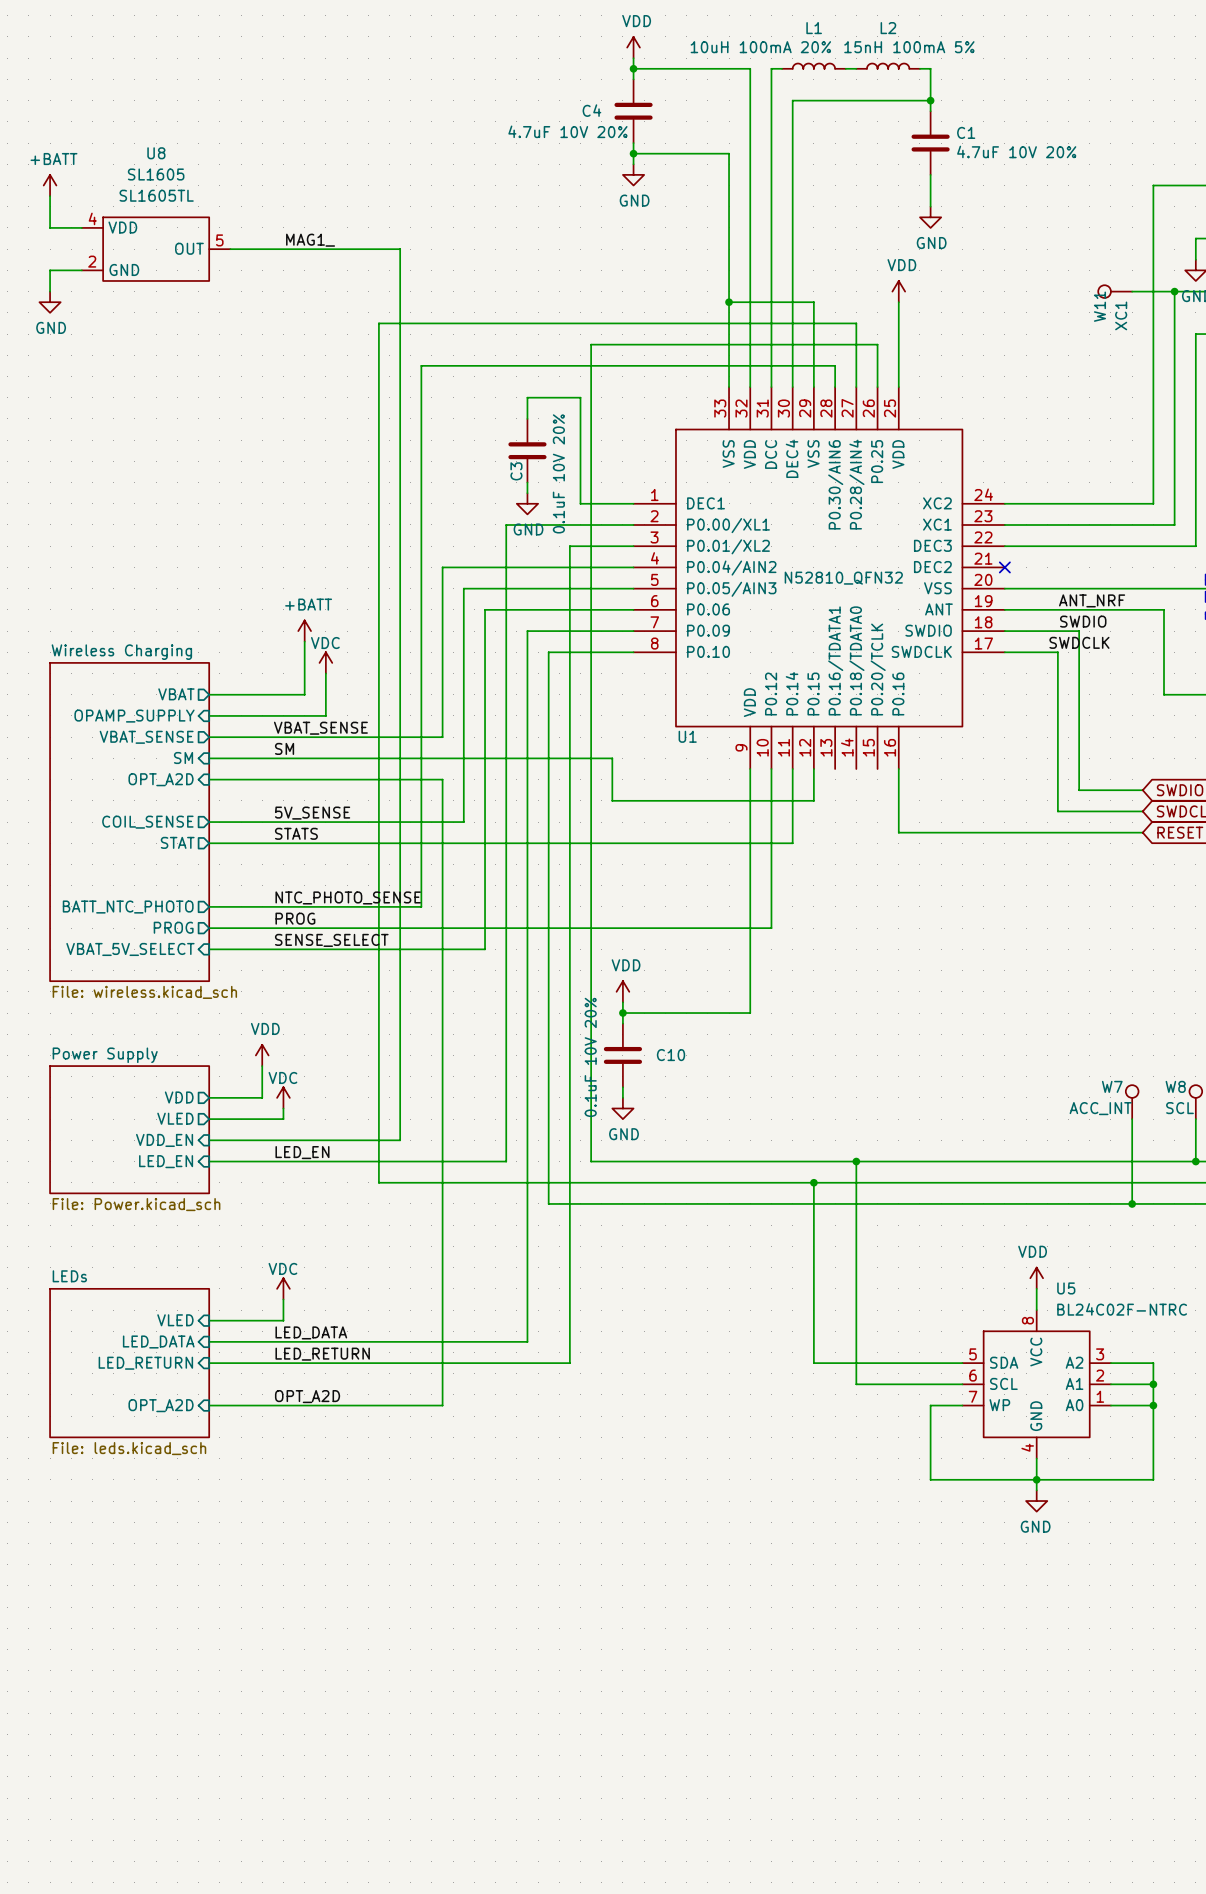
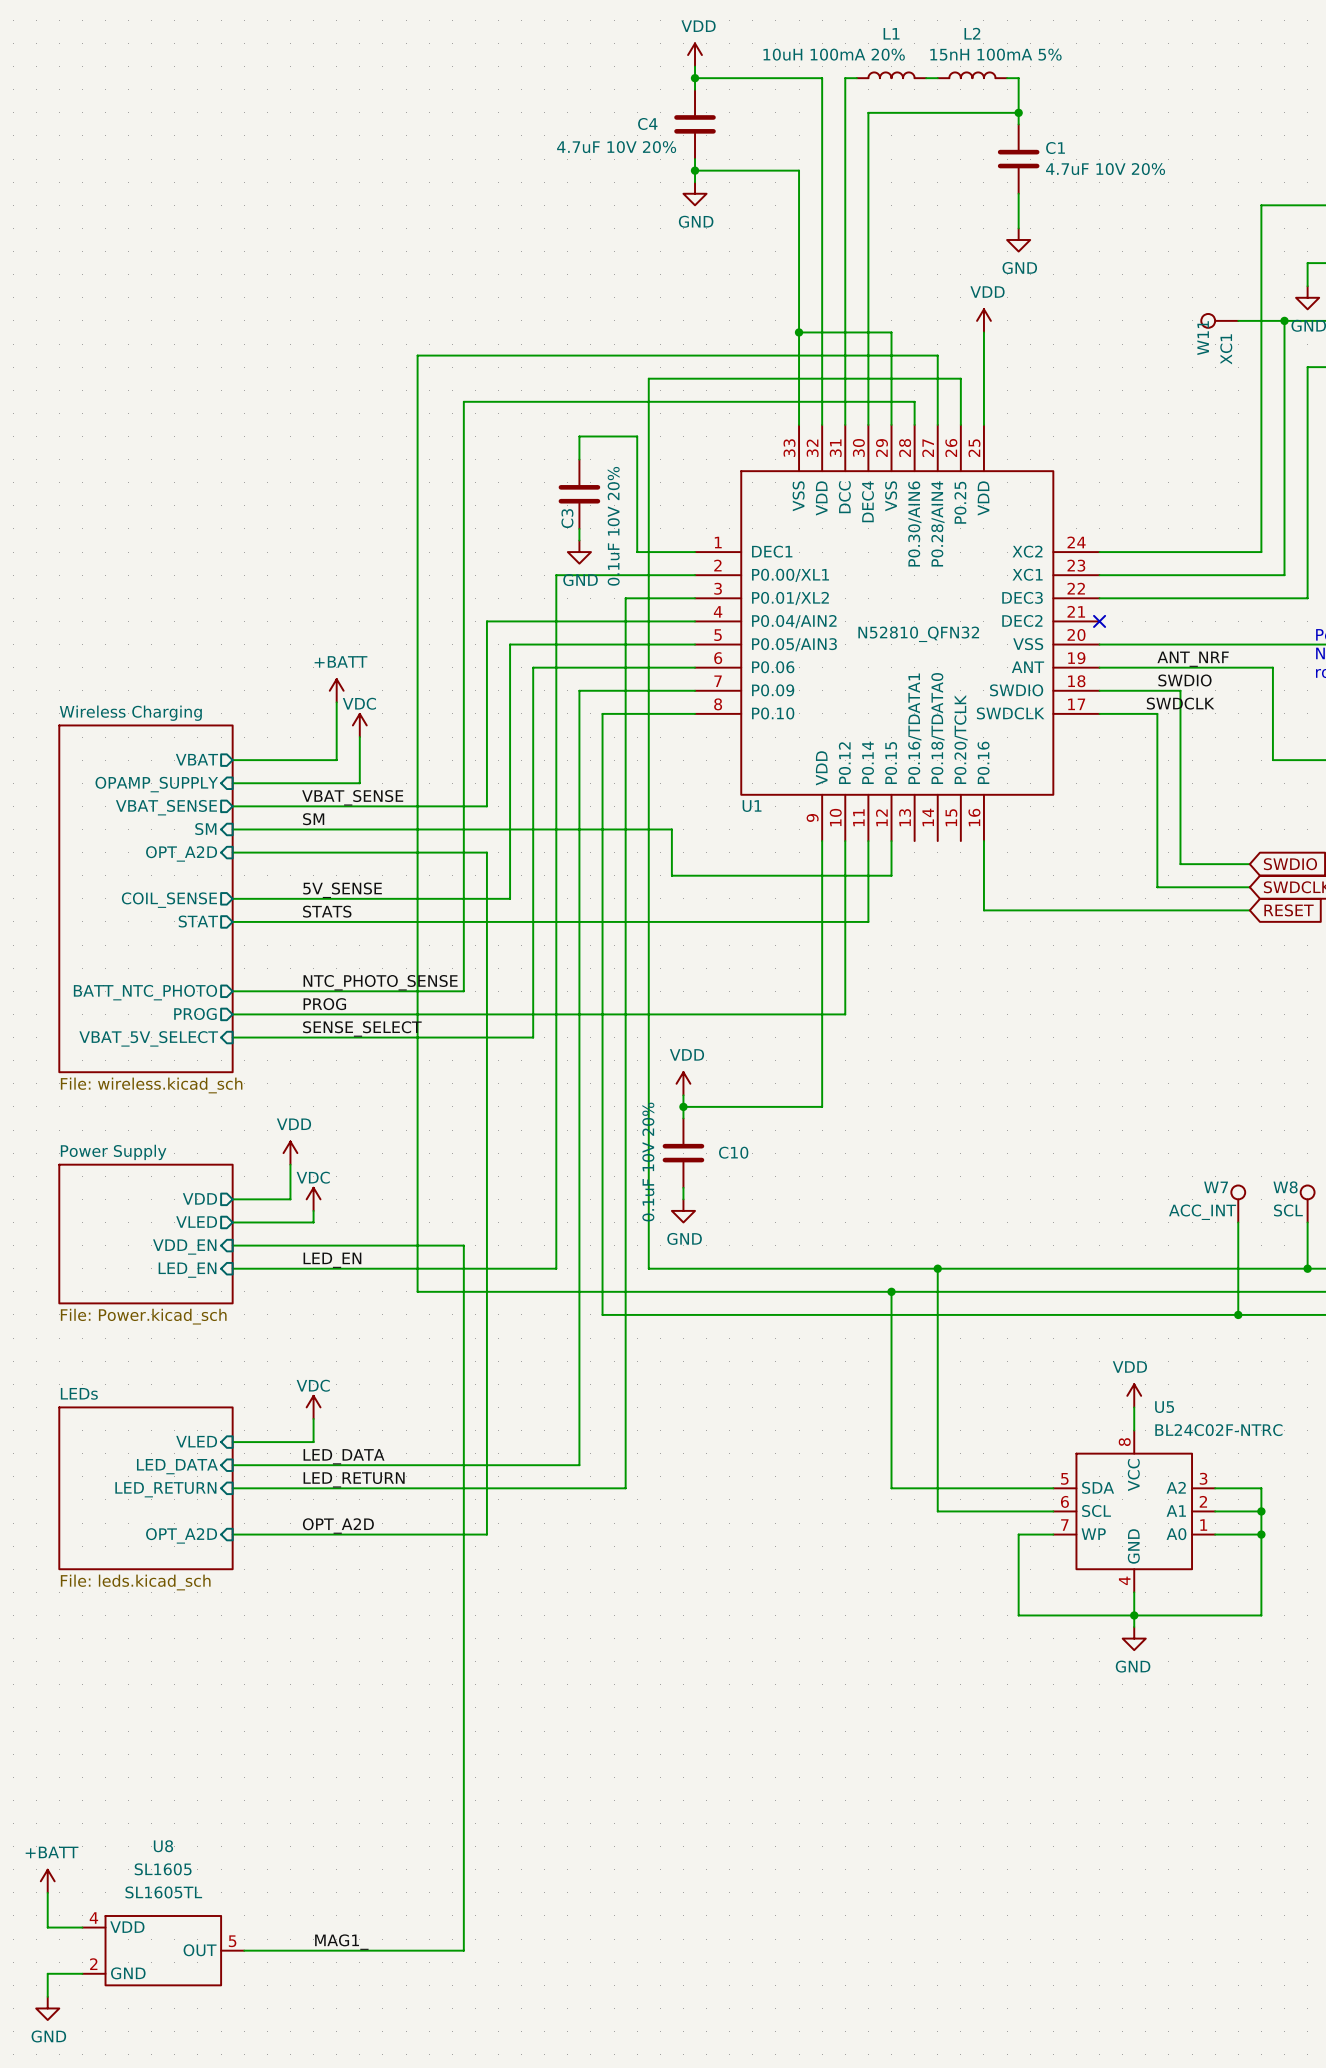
power symbol: +BATT (50, 185) -> none
wire: (50, 196) (50, 227) (81, 227) -> none
label: MAG1_ (310, 240) -> none
U8 position: (156, 249) -> (163, 1950)
wire: (230, 249) (400, 249) (400, 1140) -> (244, 1950) (463, 1950) (463, 1245) (440, 1245)
wire: (81, 270) (50, 270) (50, 291) -> none
power symbol: GND (50, 302) -> none
power symbol: none -> +BATT (47, 1881)
wire: none -> (47, 1892) (47, 1927) (82, 1927)
label: none -> MAG1_ (341, 1942)
wire: none -> (82, 1973) (47, 1973) (47, 1996)
power symbol: none -> GND (47, 2008)

